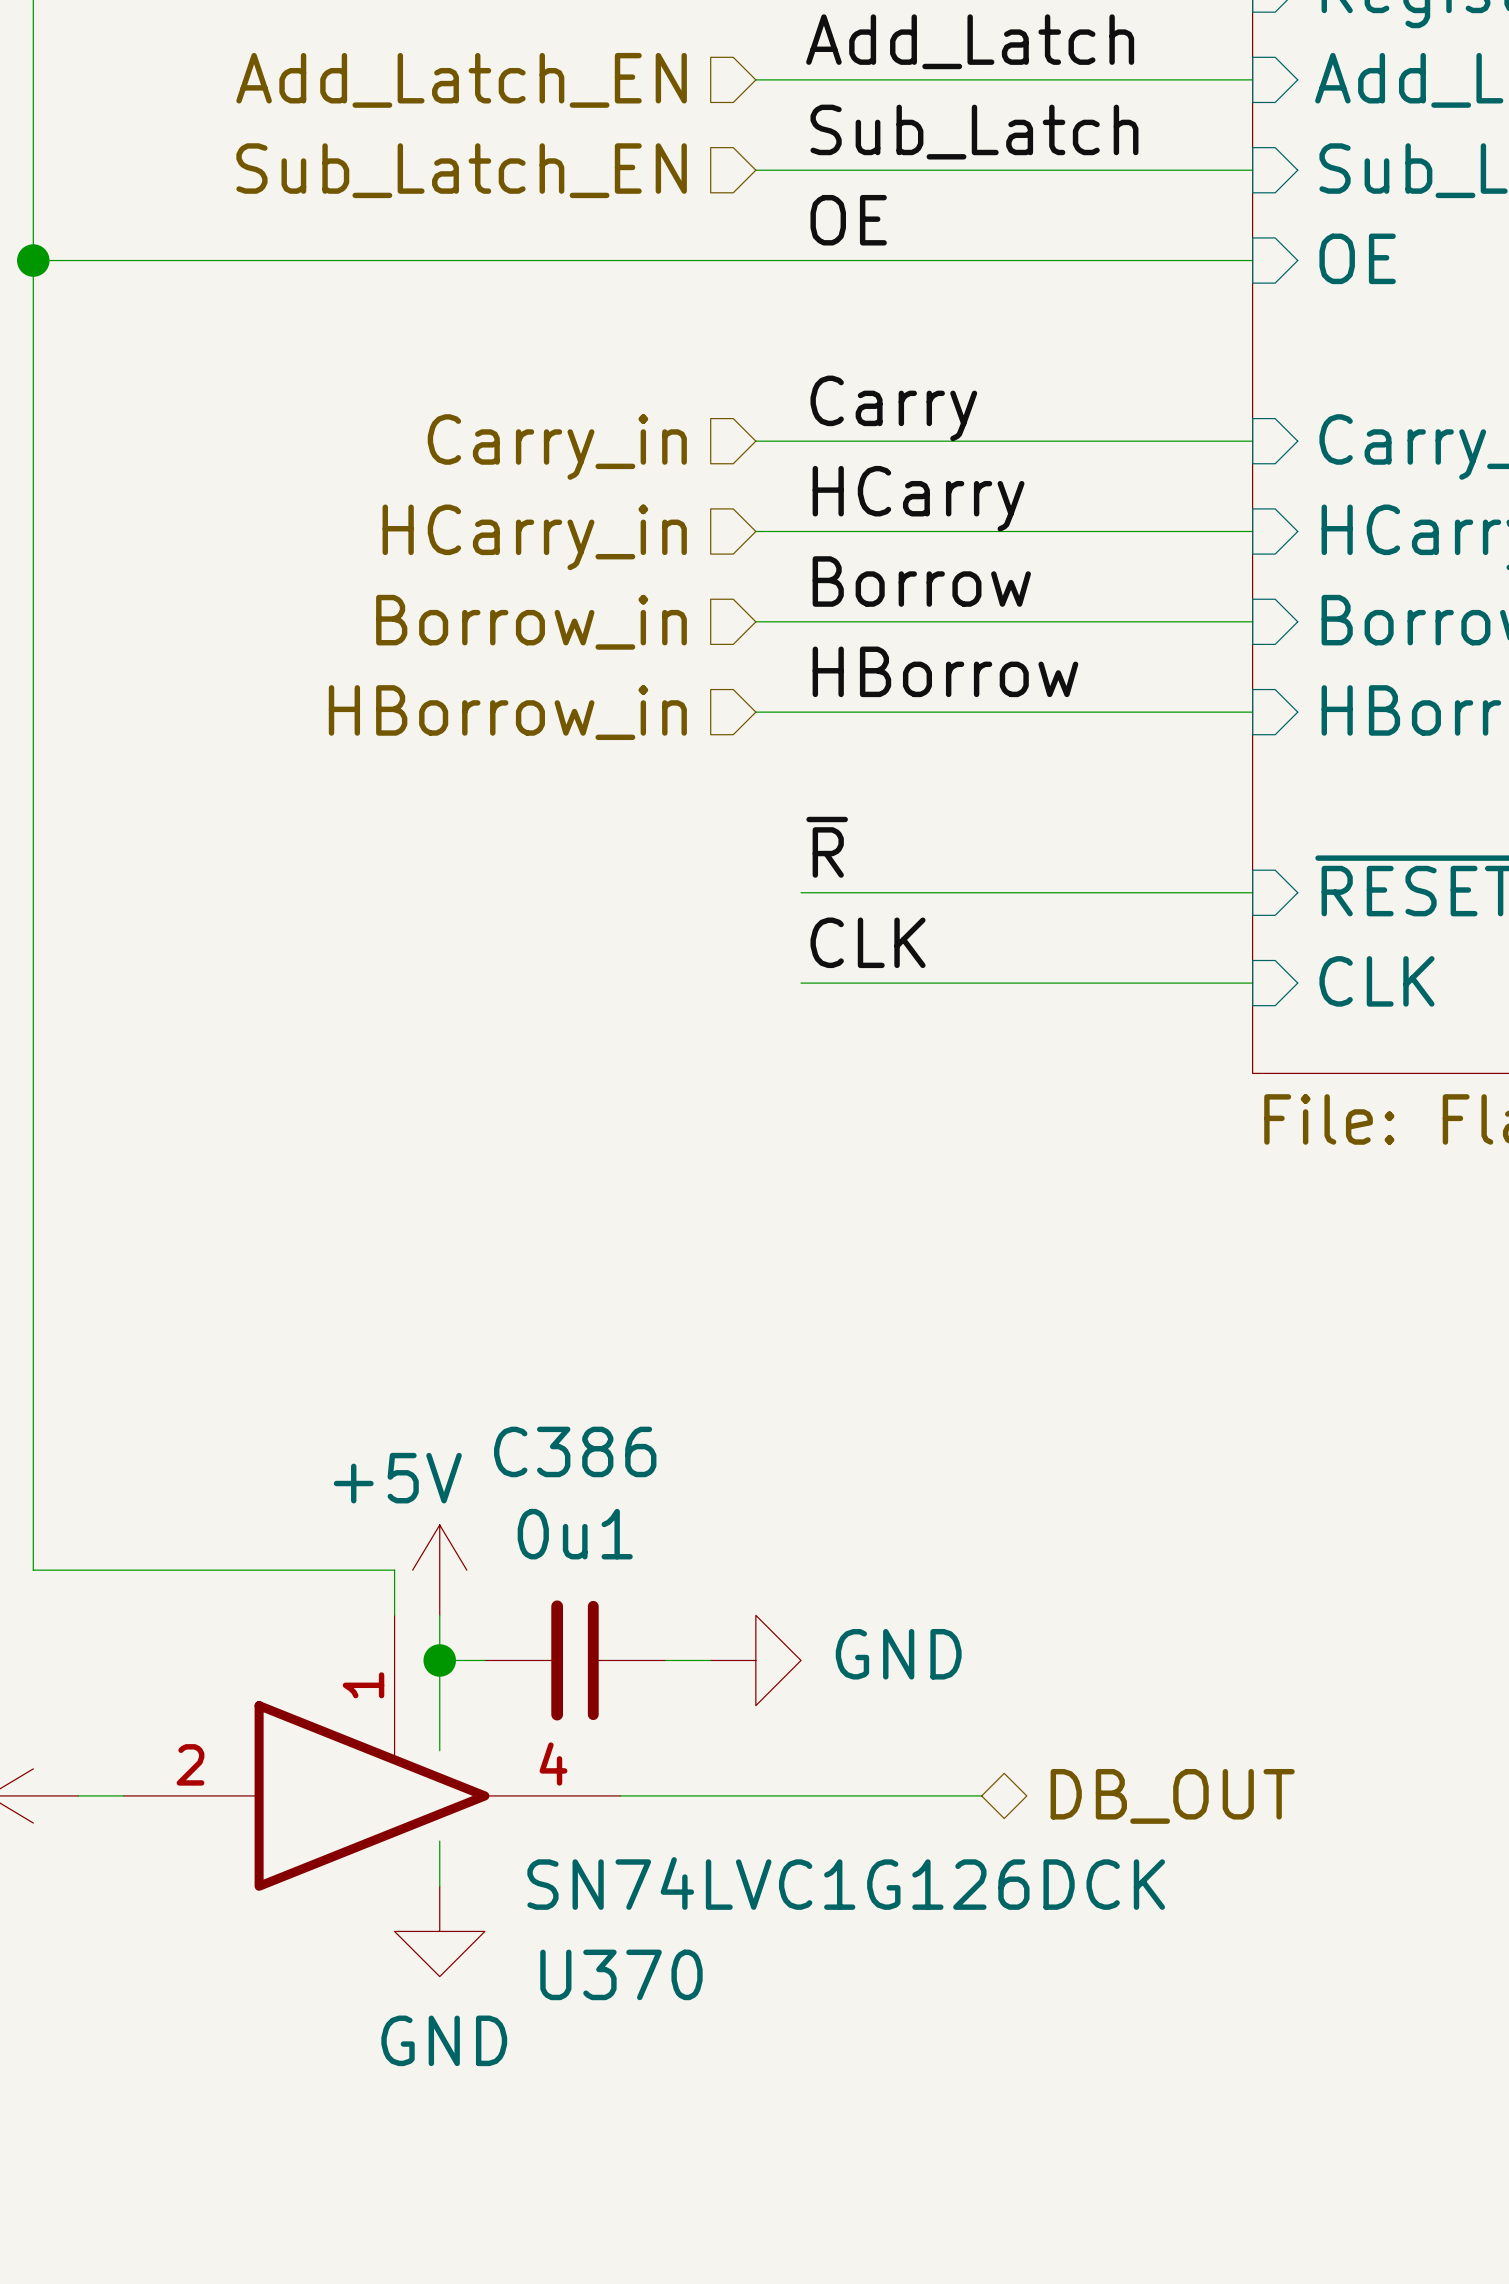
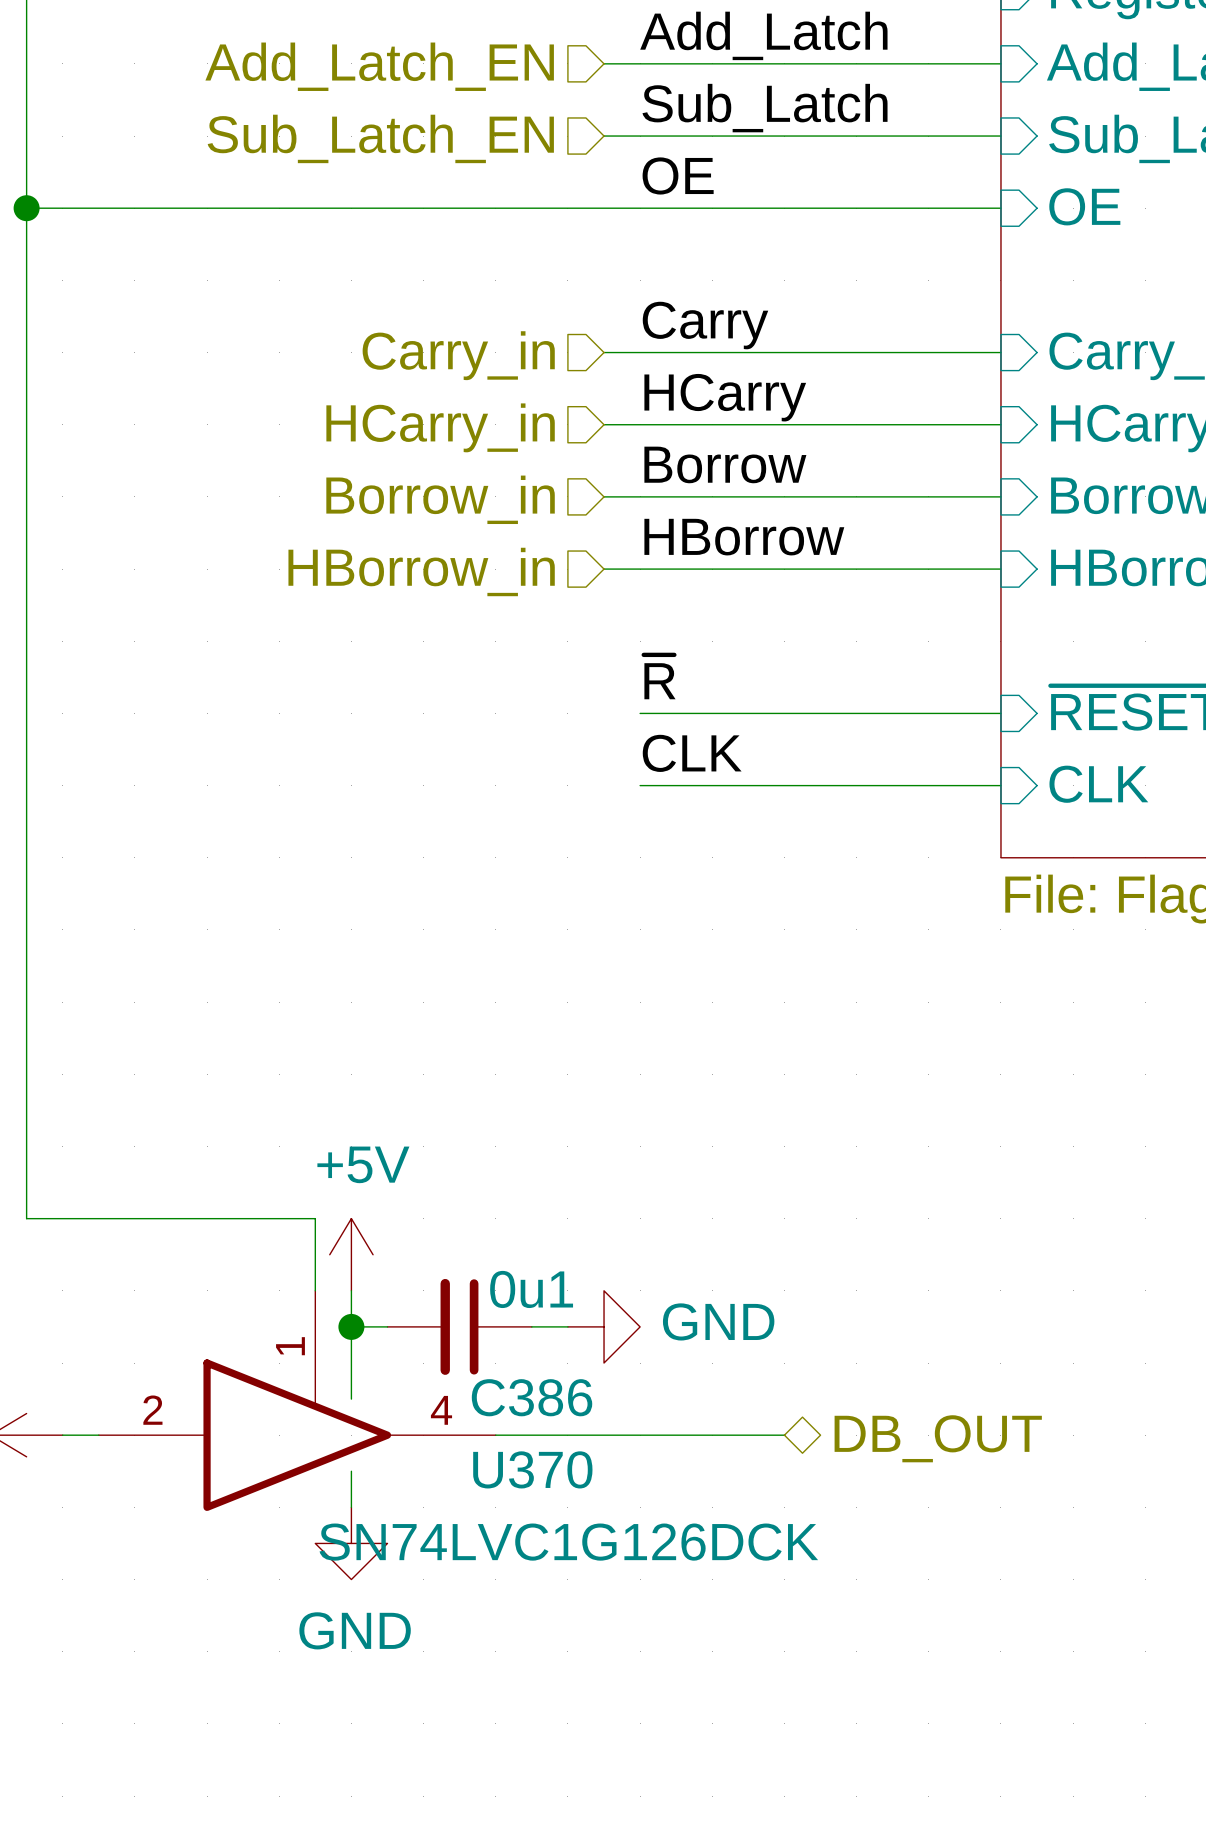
C386 name position: C386 (575, 1451) -> C386 (532, 1397)
power symbol text position: +5V (397, 1478) -> +5V (363, 1164)
wire: (33, 1524) (33, 1570) (394, 1570) -> (26, 1218) (315, 1218) (315, 1254)
C386 value position: 0u1 (575, 1534) -> 0u1 (531, 1289)
U370 value position: SN74LVC1G126DCK (846, 1883) -> SN74LVC1G126DCK (568, 1542)
U370 name position: U370 (621, 1974) -> U370 (532, 1469)

